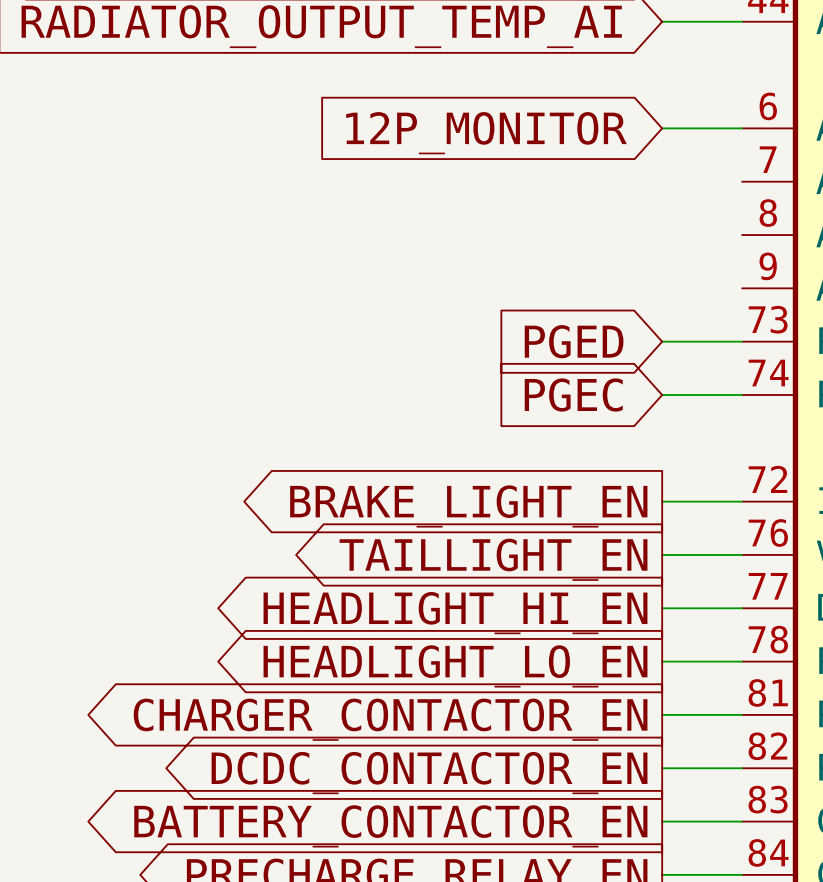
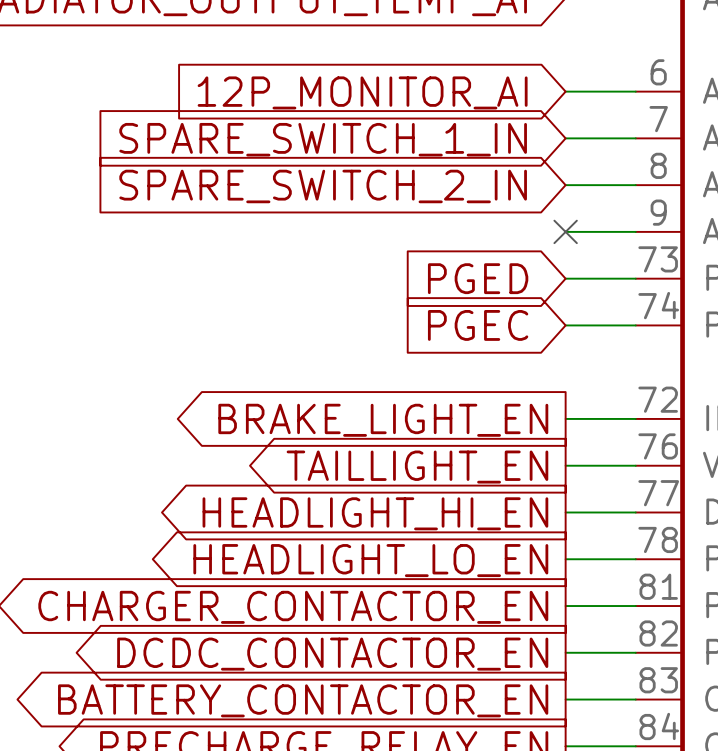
global label: 12P_MONITOR (486, 133) -> 12P_MONITOR_AI (362, 92)
wire: none -> (565, 138) (635, 138)
global label: none -> SPARE_SWITCH_1_IN (323, 139)
wire: none -> (565, 185) (635, 185)
global label: none -> SPARE_SWITCH_2_IN (323, 186)
wire: none -> (565, 231) (635, 231)
no-connect mark: none -> (565, 231)

